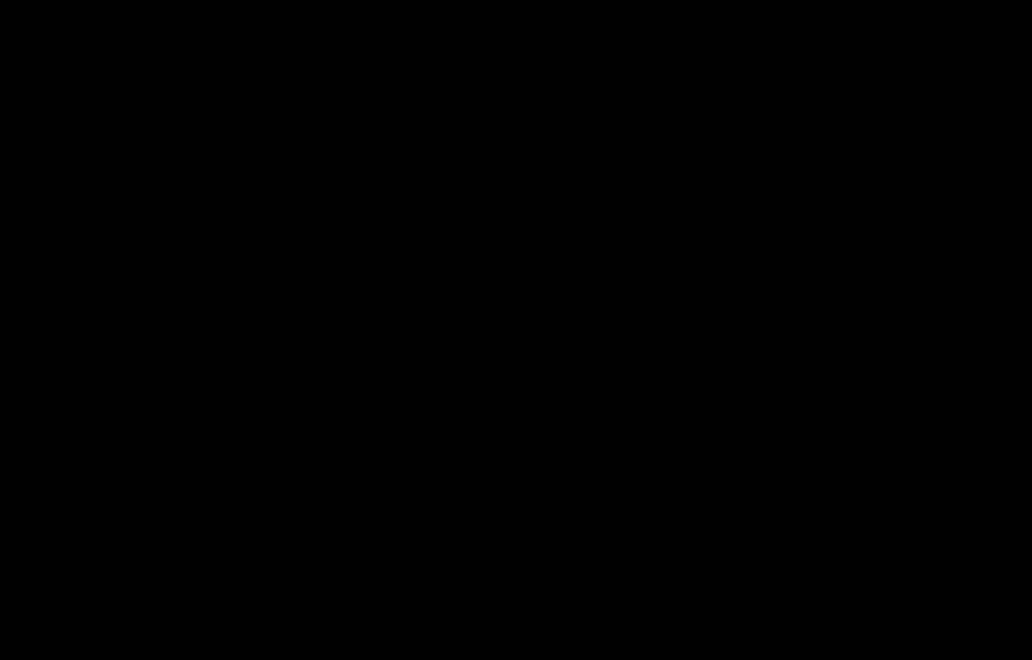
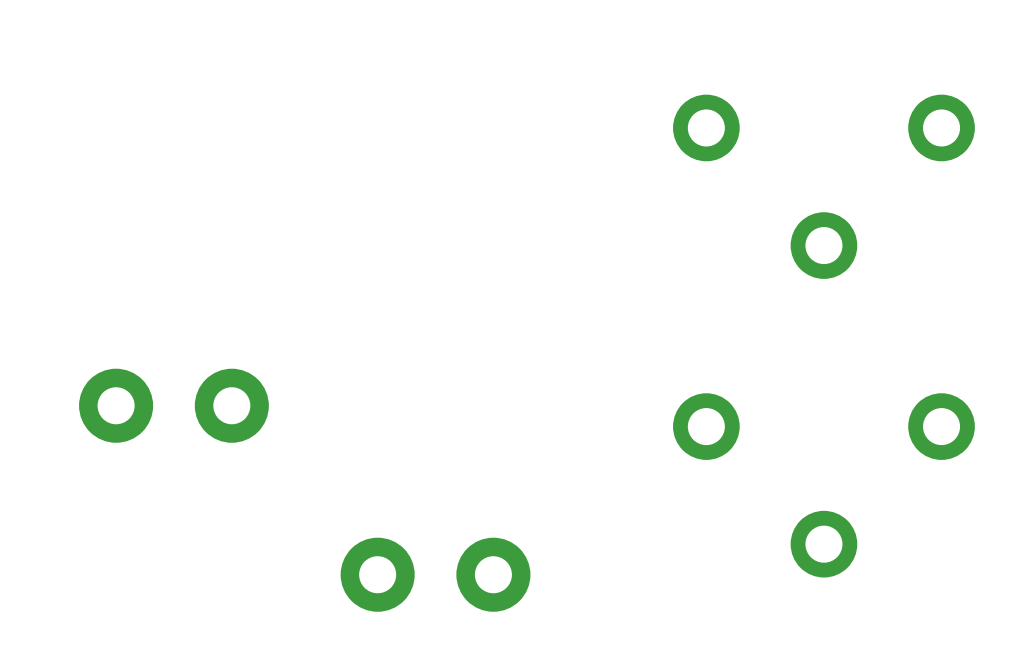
part: none -> (823, 186)
part: none -> (173, 405)
part: none -> (823, 485)
part: none -> (435, 574)

